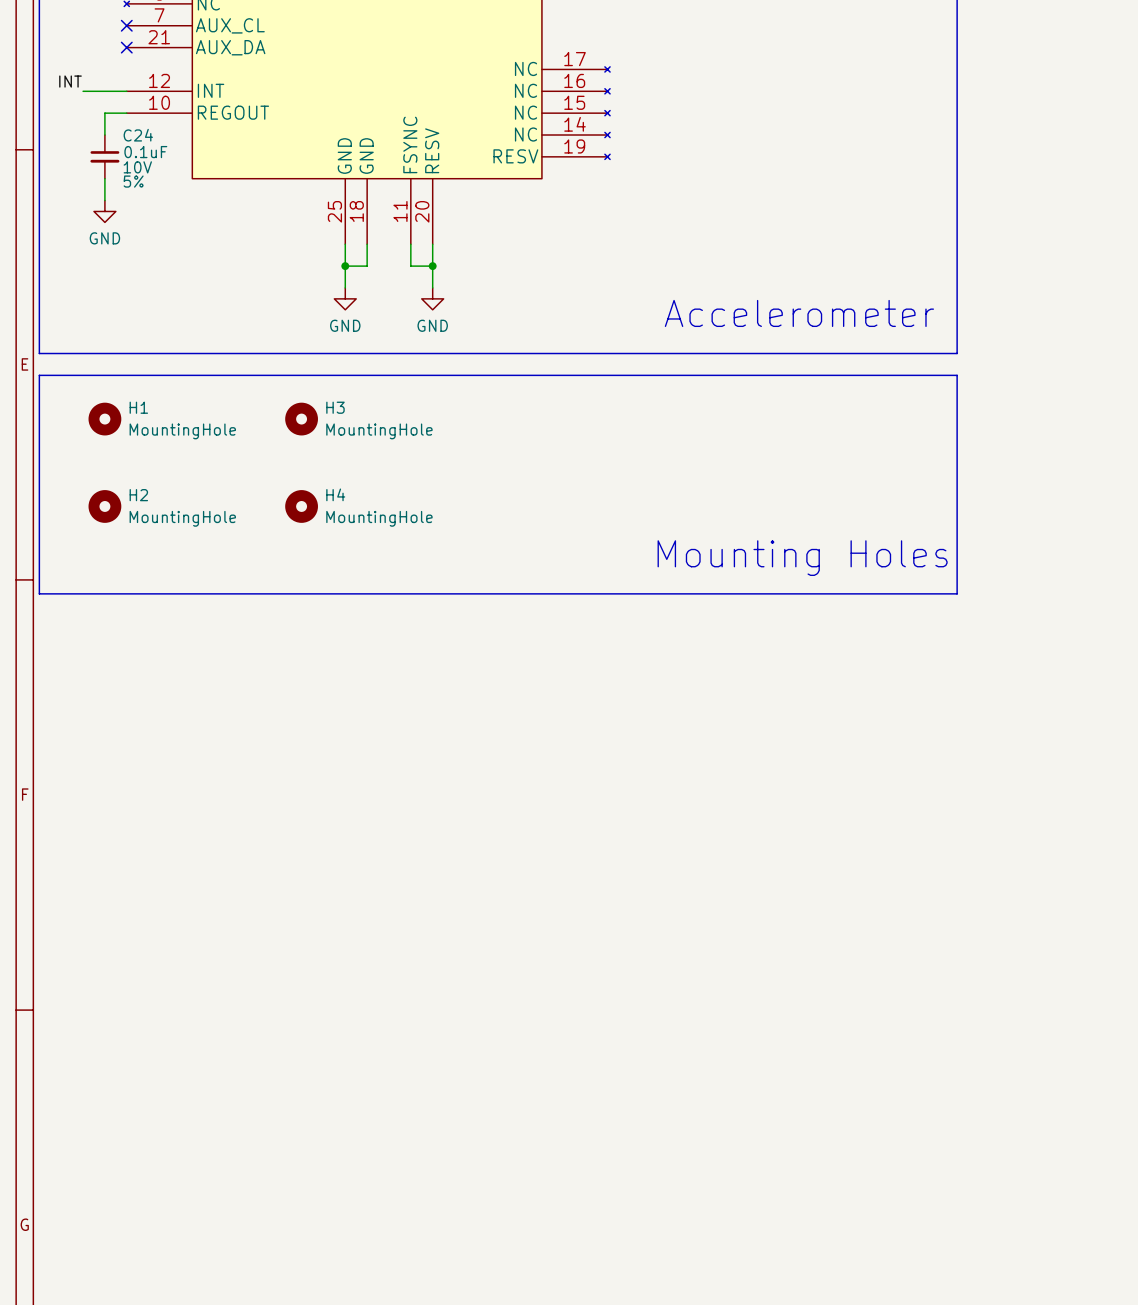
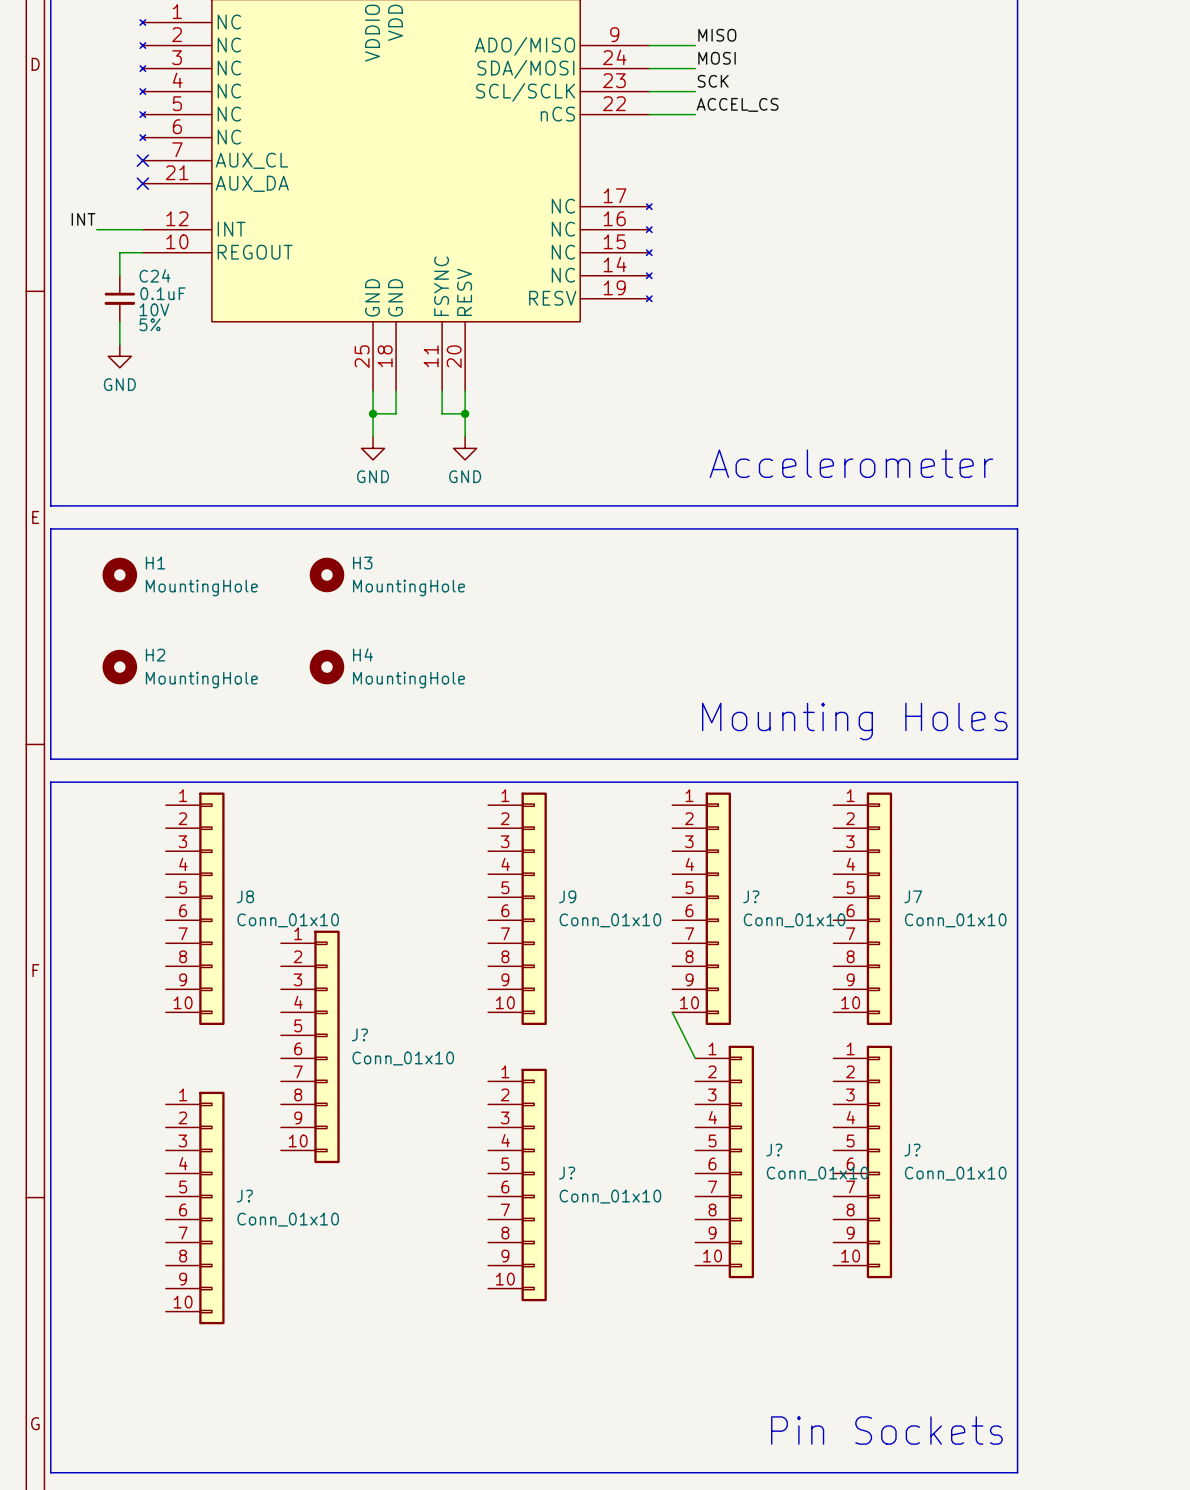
line: none -> (50, 782) (1017, 782) (1017, 1472) (50, 1472) (50, 782)
J8: none -> Conn_01x10 (195, 908)
J9: none -> Conn_01x10 (517, 908)
J?: none -> Conn_01x10 (701, 908)
J7: none -> Conn_01x10 (862, 908)
wire: none -> (672, 1012) (695, 1058)
J?: none -> Conn_01x10 (310, 1046)
J?: none -> Conn_01x10 (724, 1161)
J?: none -> Conn_01x10 (862, 1161)
J?: none -> Conn_01x10 (517, 1184)
J?: none -> Conn_01x10 (195, 1208)
text: none -> Pin Sockets (886, 1430)

